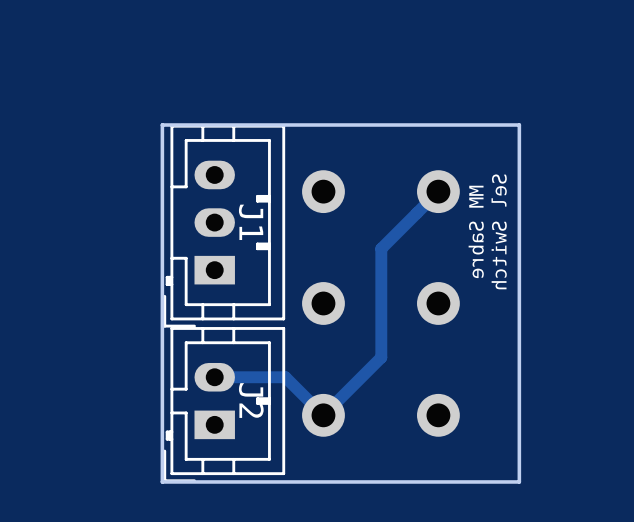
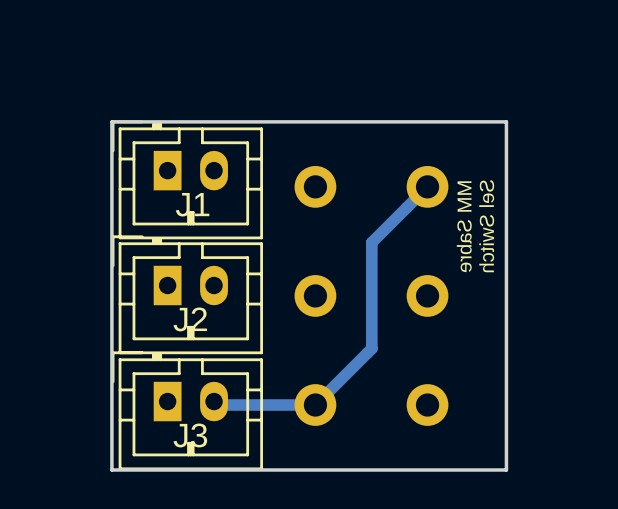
board edge: (162, 124) (162, 481) -> (158, 121) (111, 121) (111, 470) (158, 470)
J1 footprint: [163, 124, 286, 328] -> [111, 120, 264, 240]
track: (214, 377) (285, 377) (323, 415) -> (214, 401) (217, 405) (315, 405)
J2 rotation: 0° (224, 404) -> 90° clockwise (187, 294)
J2 position: (224, 404) -> (187, 294)
J3: none -> (187, 410)

